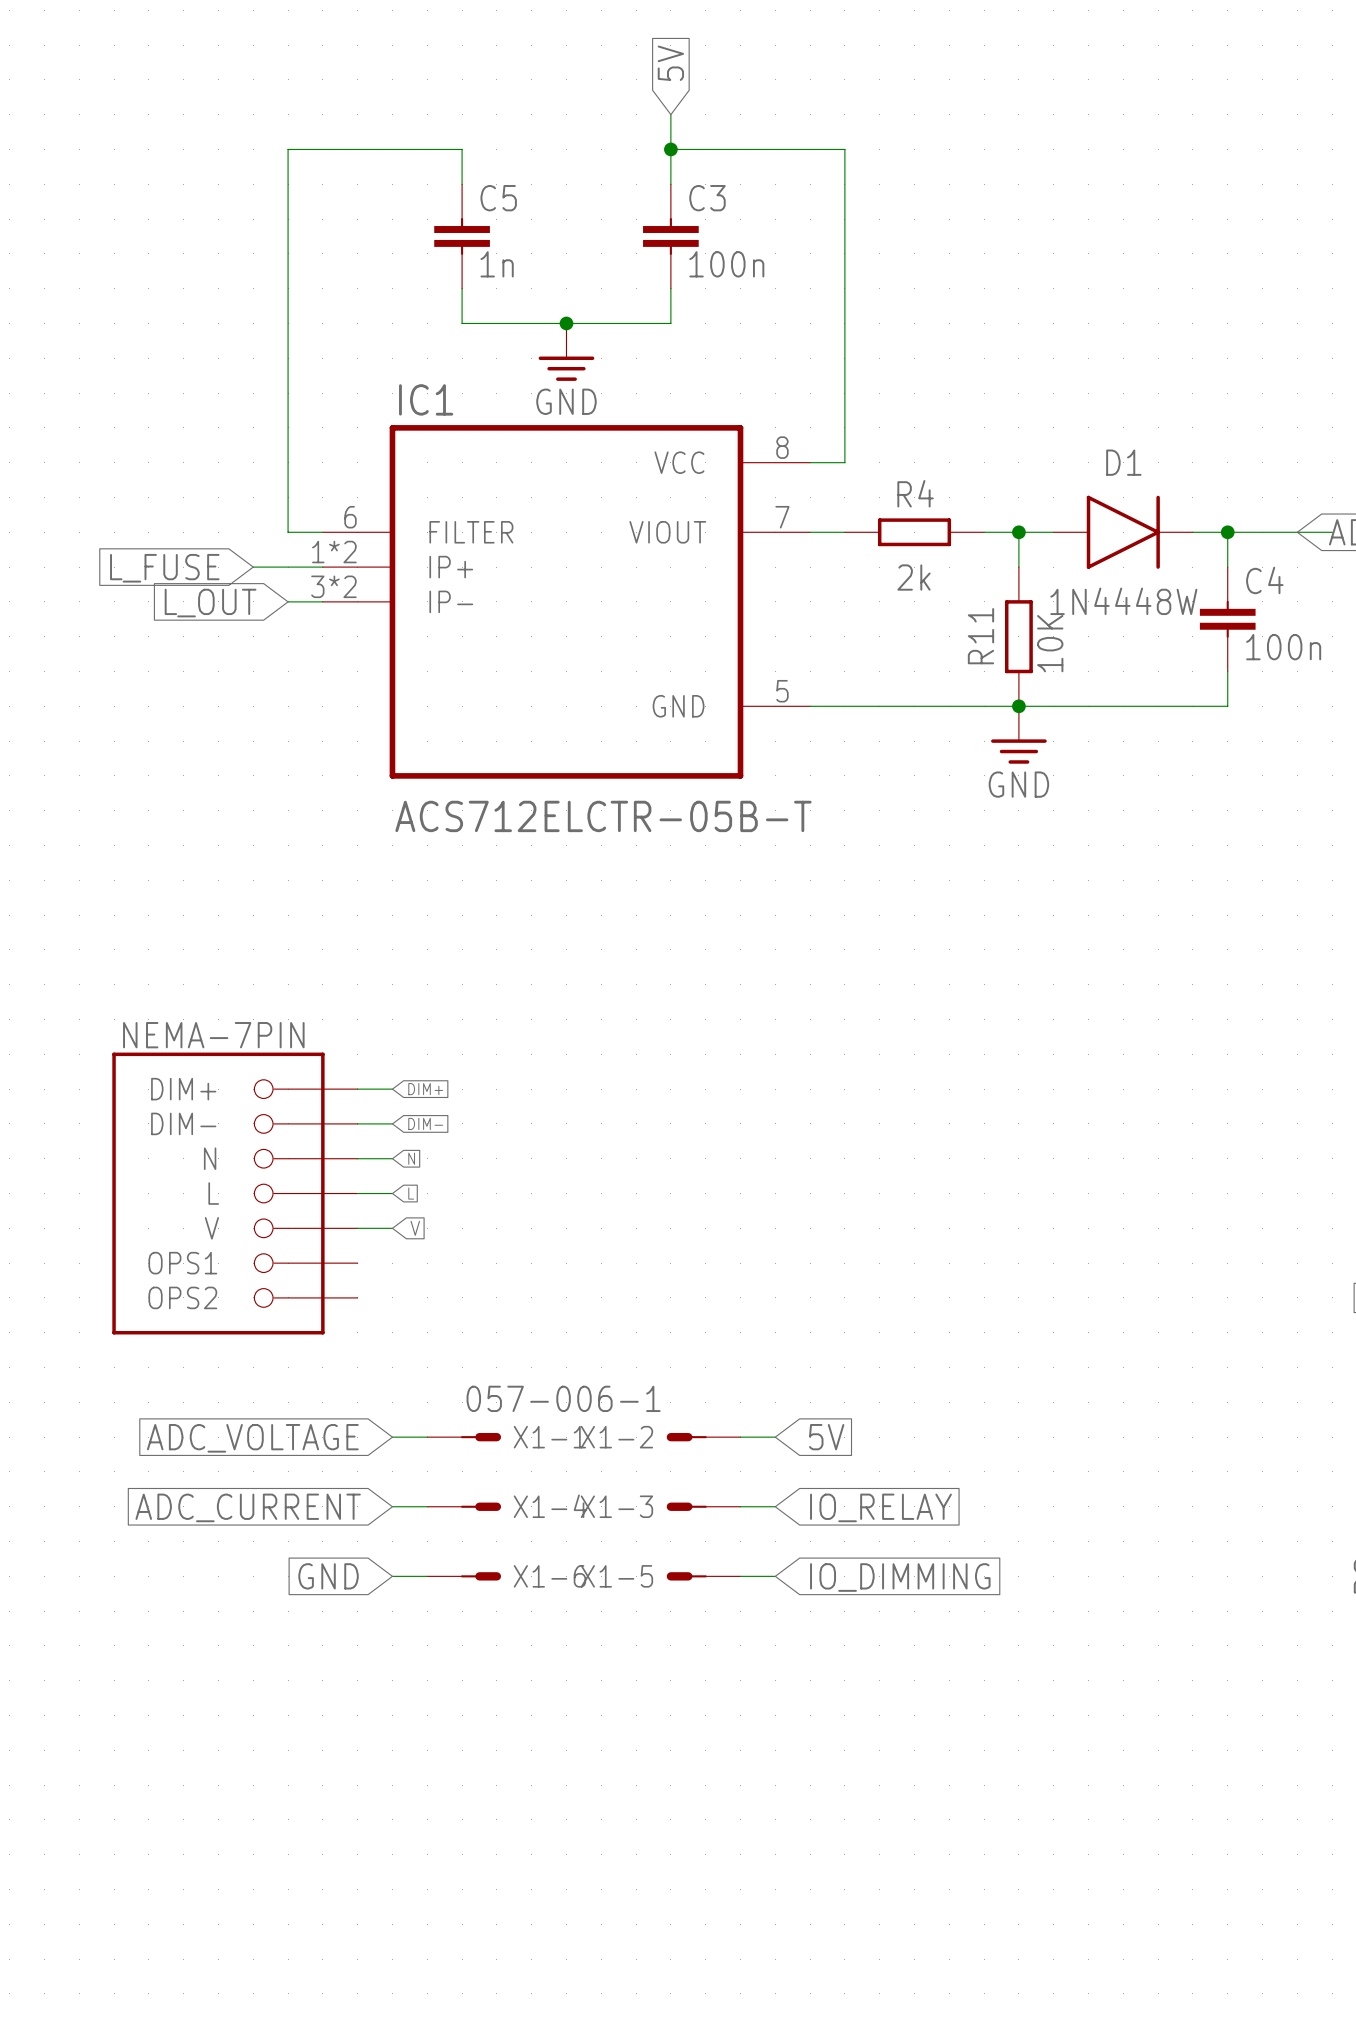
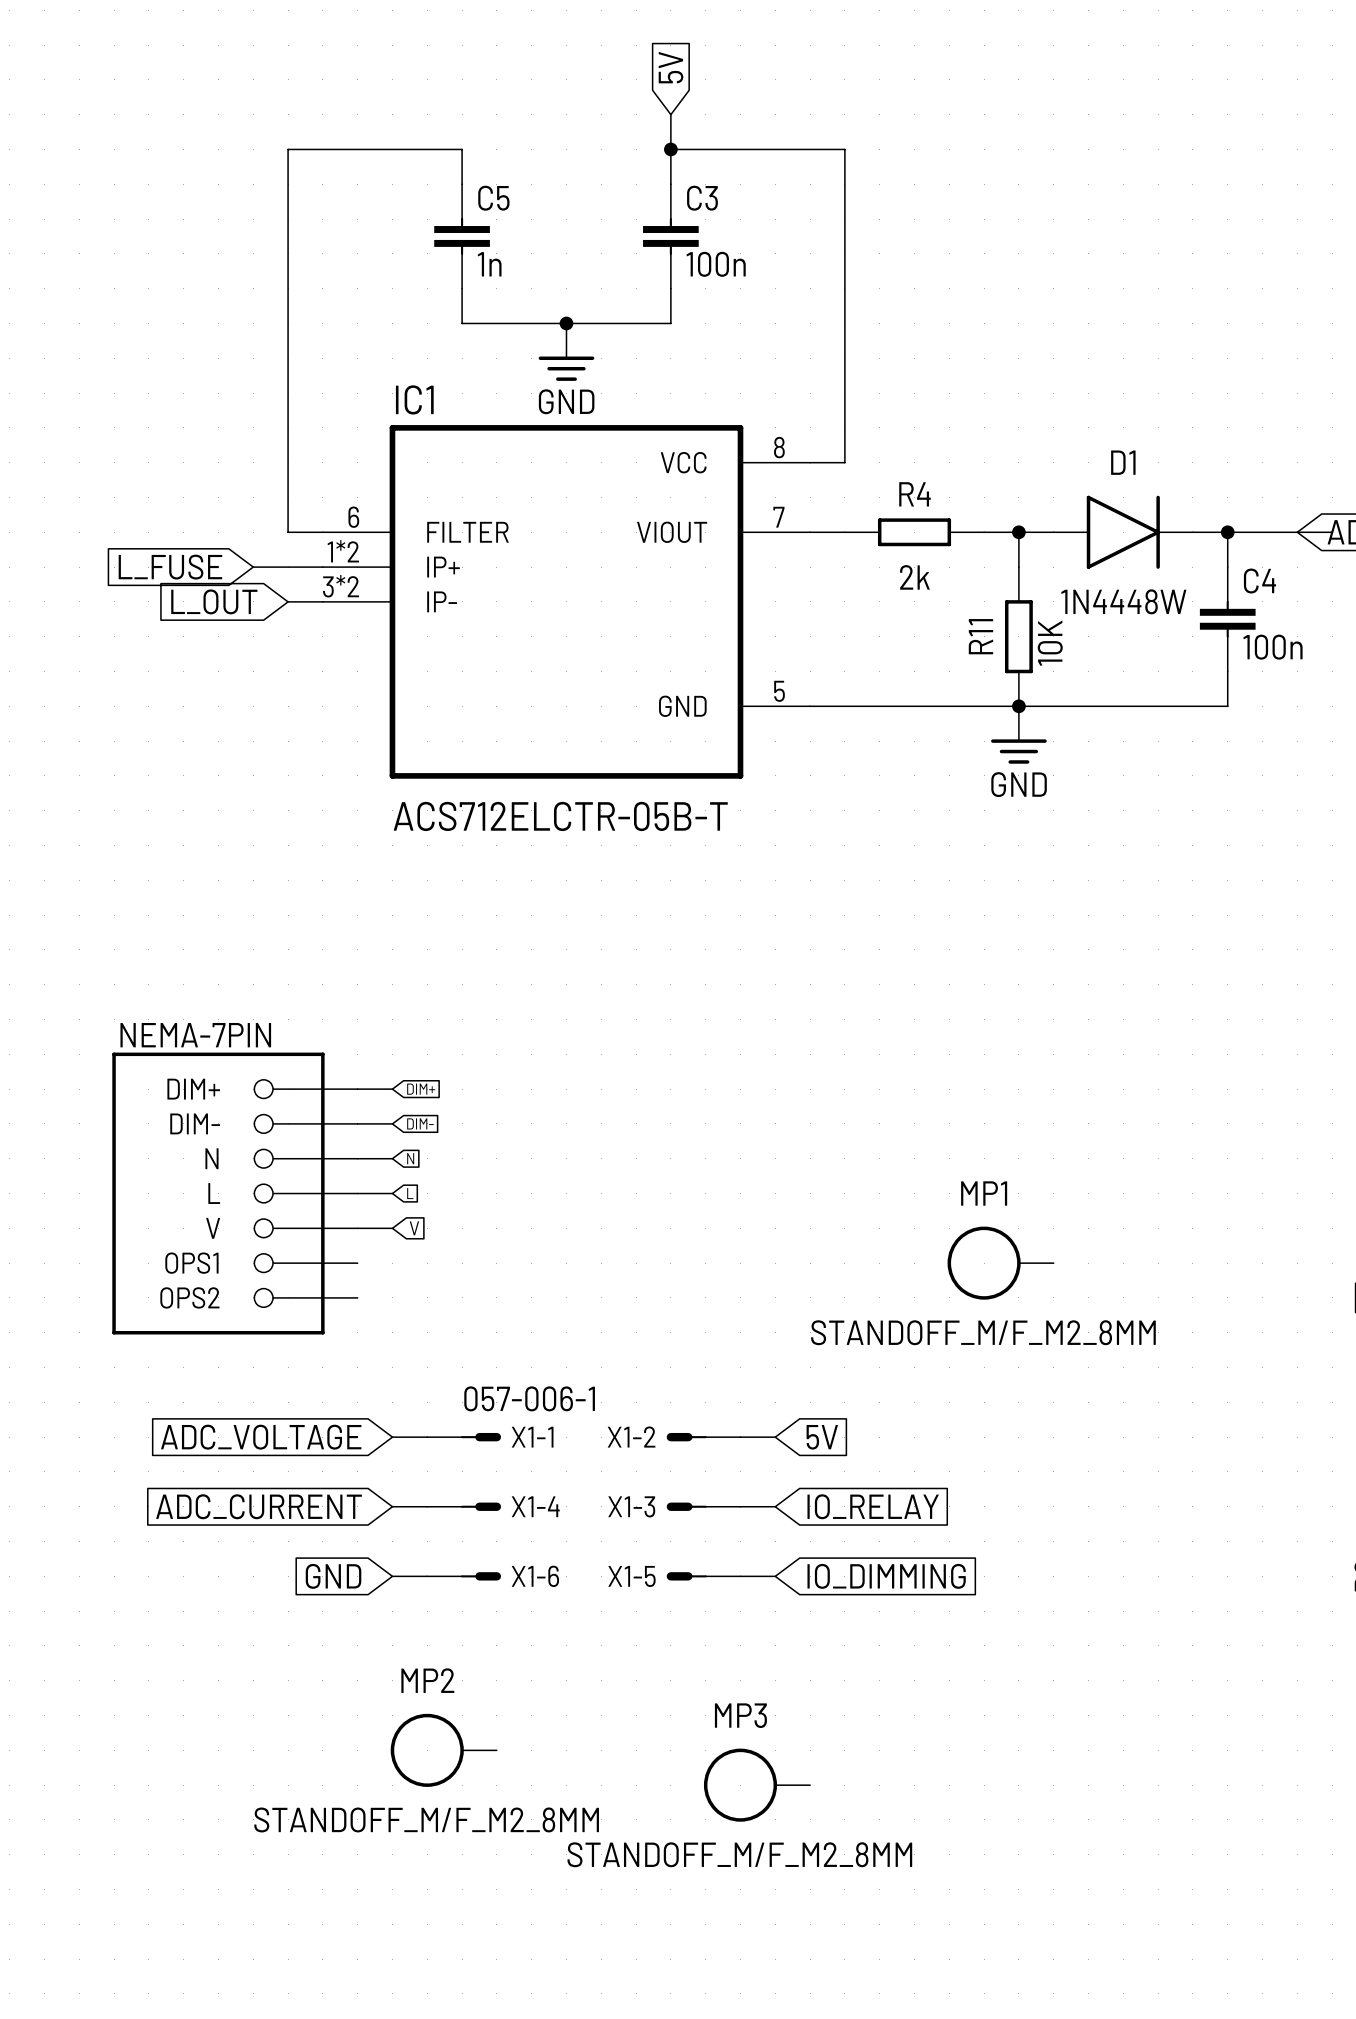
MP1: none -> STANDOFF_M/F_M2_8MM (1000, 1263)
MP2: none -> STANDOFF_M/F_M2_8MM (443, 1750)
MP3: none -> STANDOFF_M/F_M2_8MM (757, 1785)

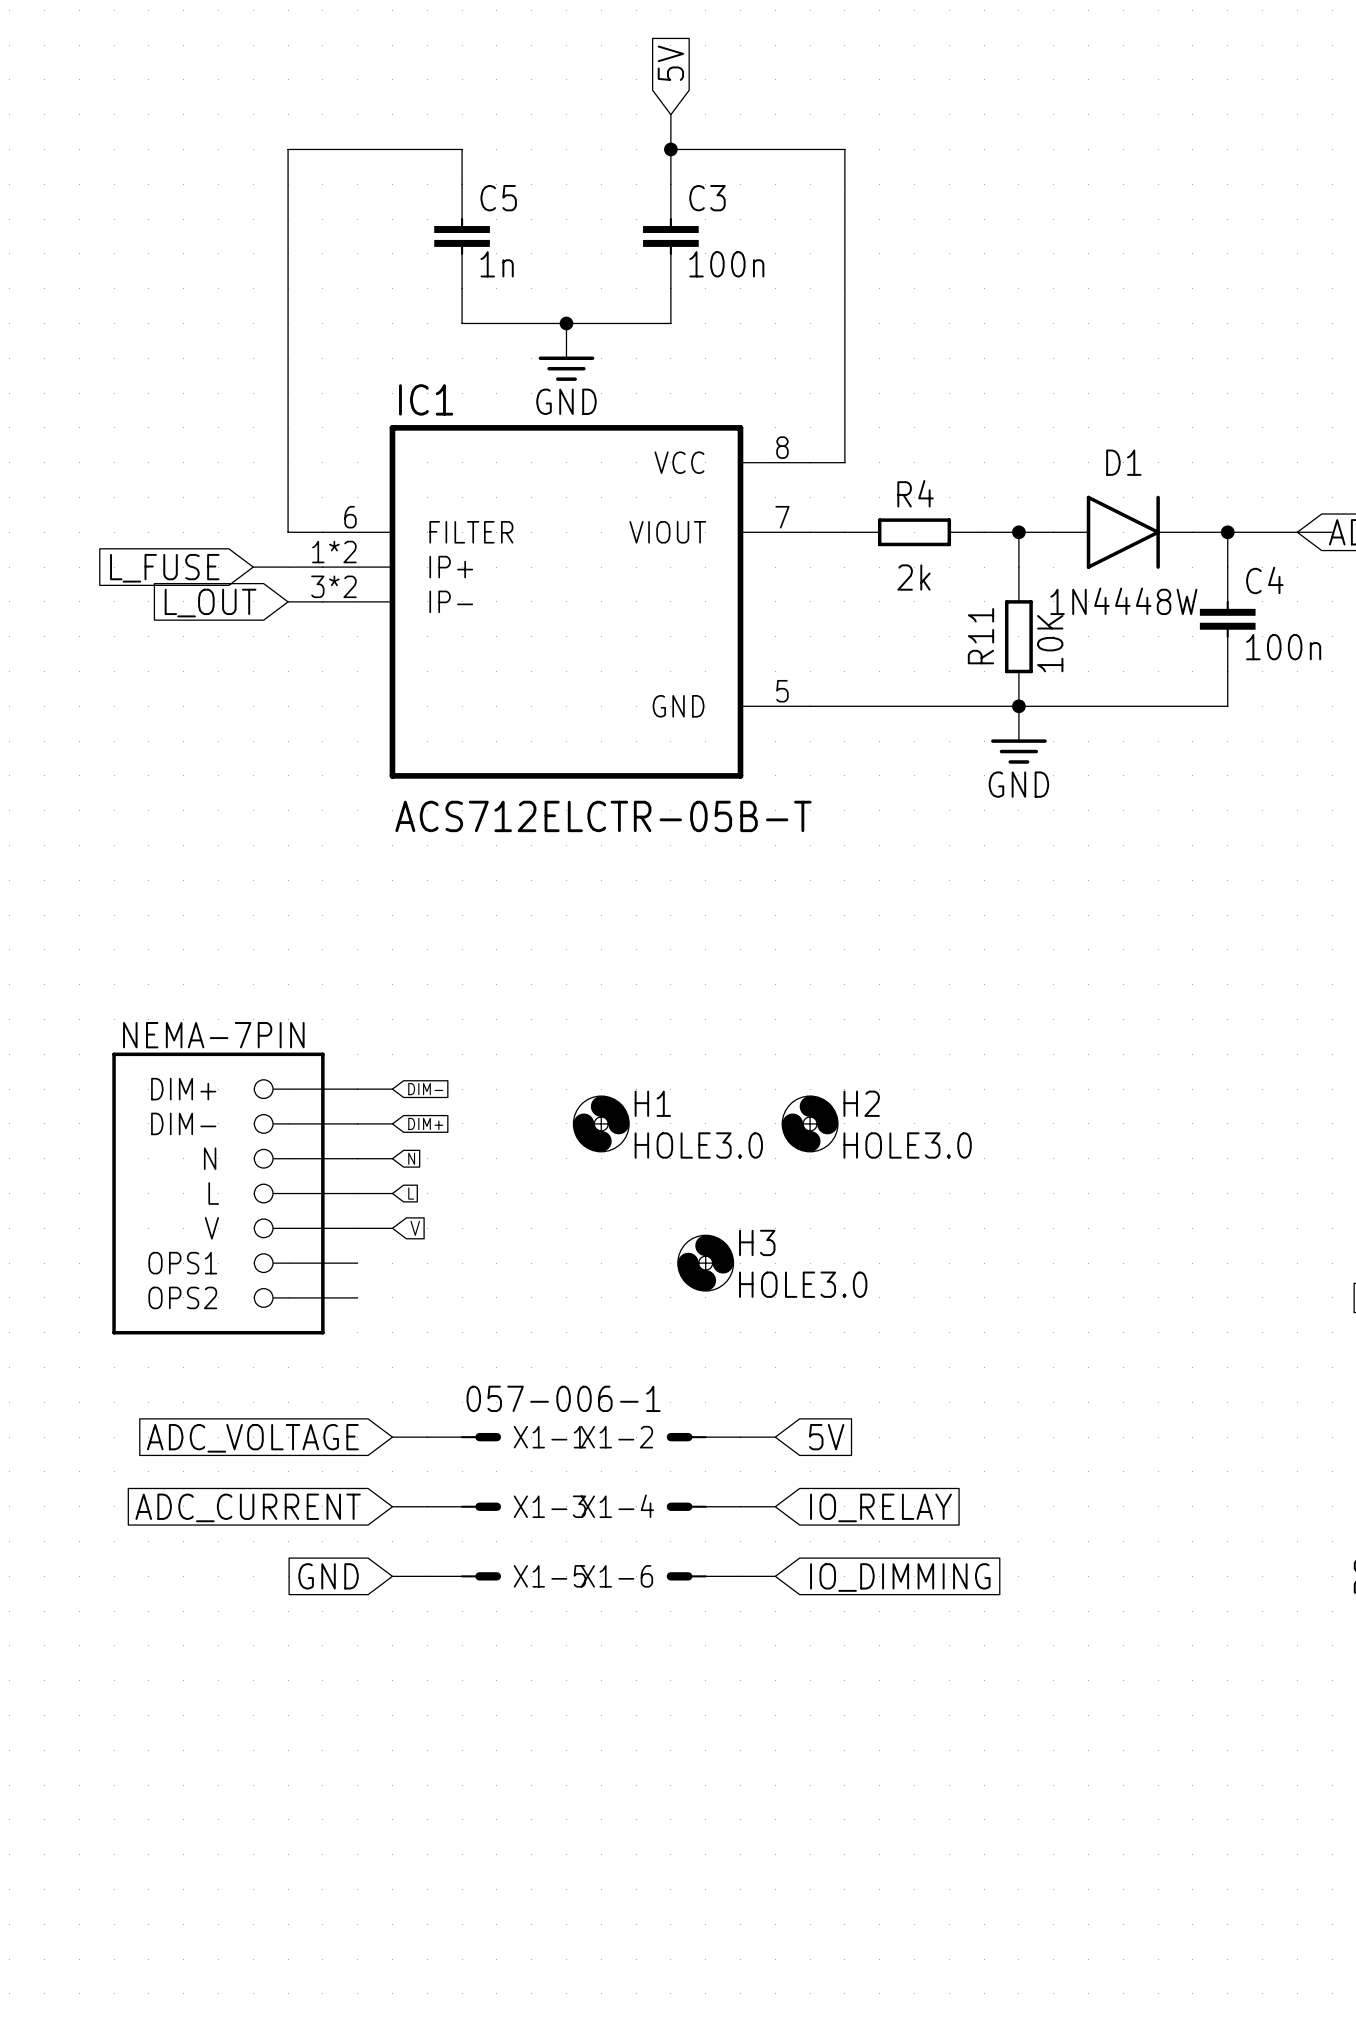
global label: DIM+ (421, 1089) -> DIM- (425, 1089)
global label: DIM- (420, 1123) -> DIM+ (425, 1123)
H1: none -> HOLE3.0 (601, 1123)
H2: none -> HOLE3.0 (810, 1123)
H3: none -> HOLE3.0 (705, 1263)
MP1: STANDOFF_M/F_M2_8MM (1000, 1263) -> none
X1-4 name: X1-4 (535, 1506) -> X1-3 (549, 1506)
X1-3 name: X1-3 (631, 1506) -> X1-4 (617, 1506)
X1-6 name: X1-6 (535, 1576) -> X1-5 (549, 1576)
X1-5 name: X1-5 (632, 1576) -> X1-6 (616, 1576)
MP2: STANDOFF_M/F_M2_8MM (443, 1750) -> none
MP3: STANDOFF_M/F_M2_8MM (757, 1785) -> none

